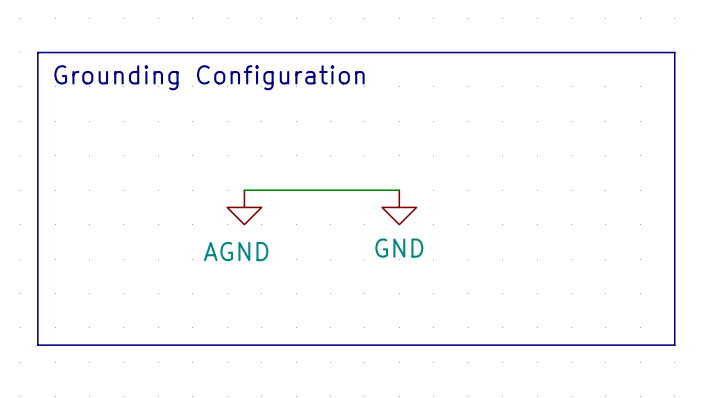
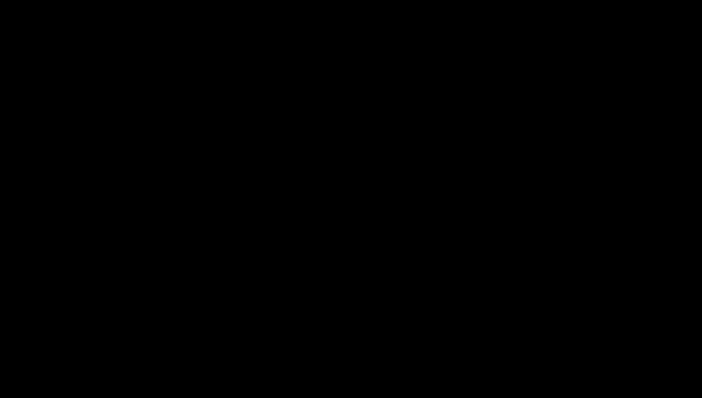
line: (37, 52) (674, 52) (674, 345) (37, 345) (37, 52) -> none
text: Grounding Configuration (209, 77) -> none
wire: (244, 190) (399, 190) -> none
power symbol: AGND (244, 207) -> none
power symbol: GND (399, 207) -> none

